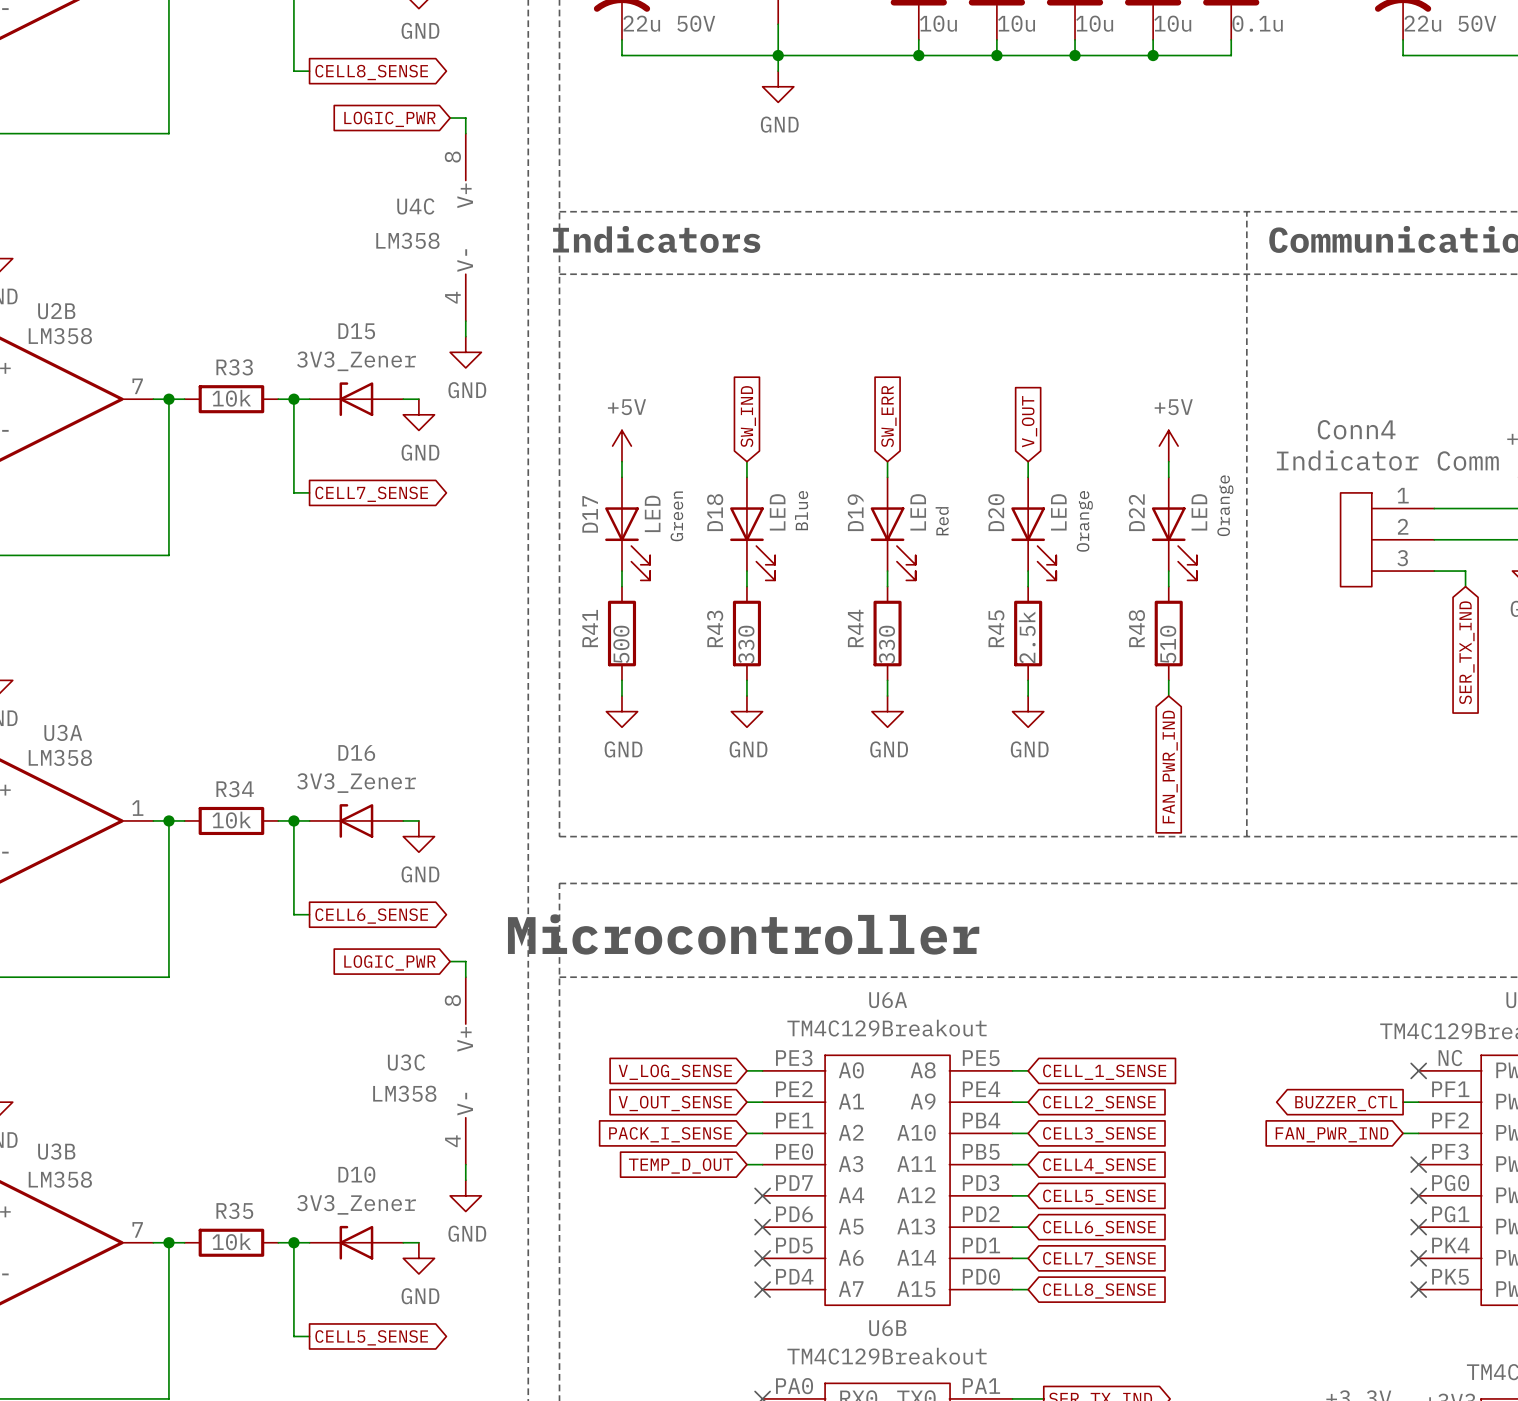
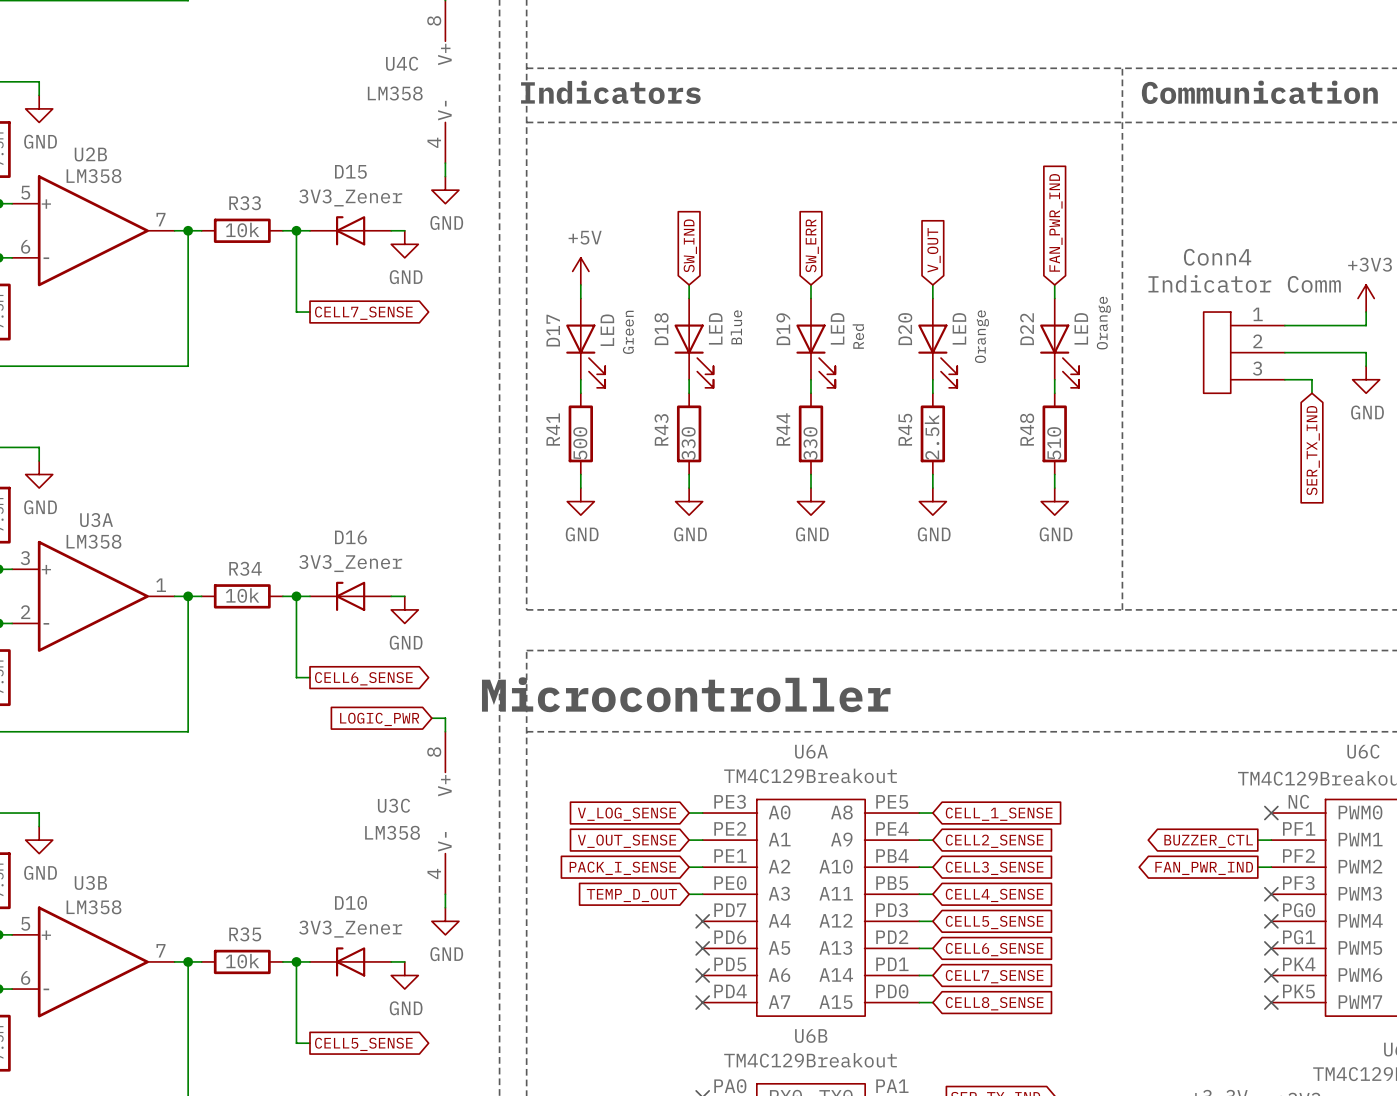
power symbol: +5V (1168, 446) -> none
power symbol: none -> GND (1054, 501)
global label rotation: 0° (1170, 767) -> 180° (1056, 222)
global label position: FAN_PWR_IND (1170, 767) -> FAN_PWR_IND (1056, 222)
global label shape: input (1332, 1134) -> output (1204, 868)

